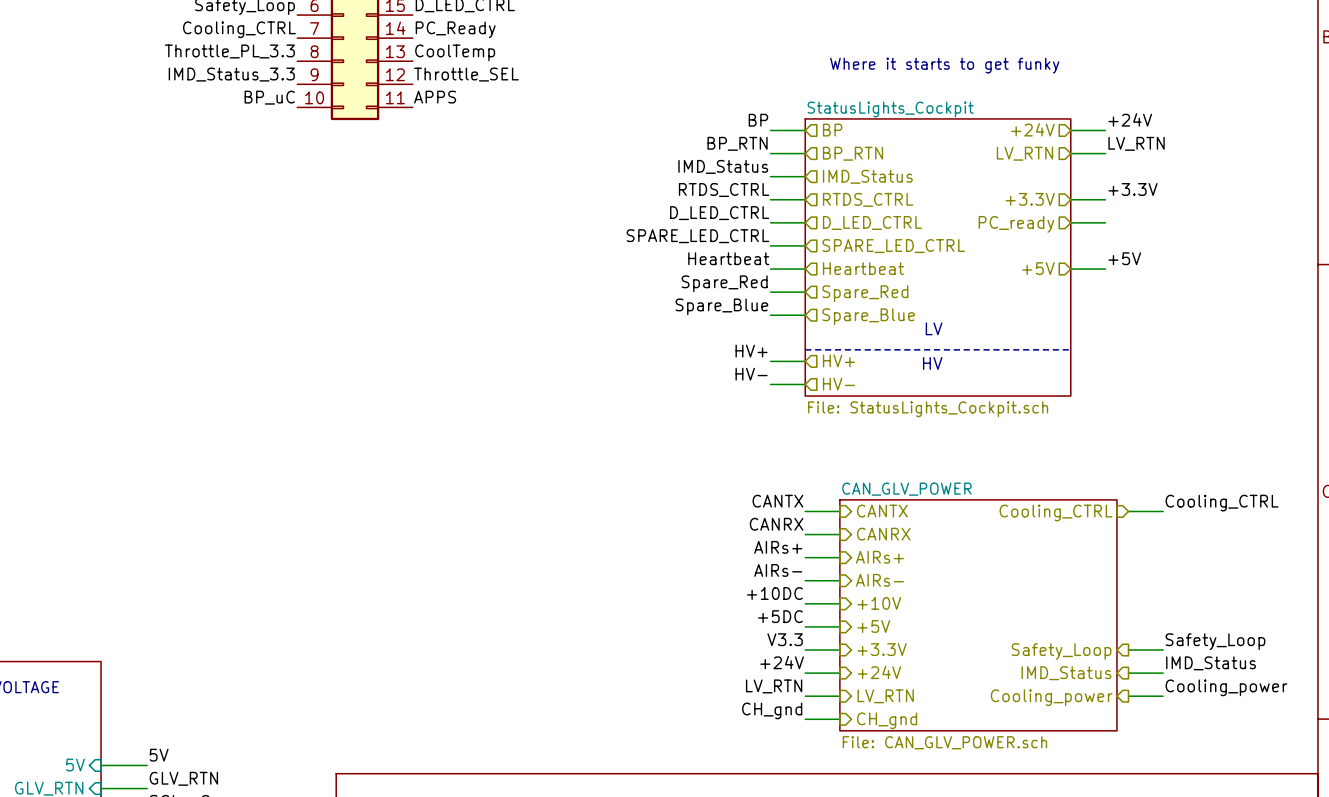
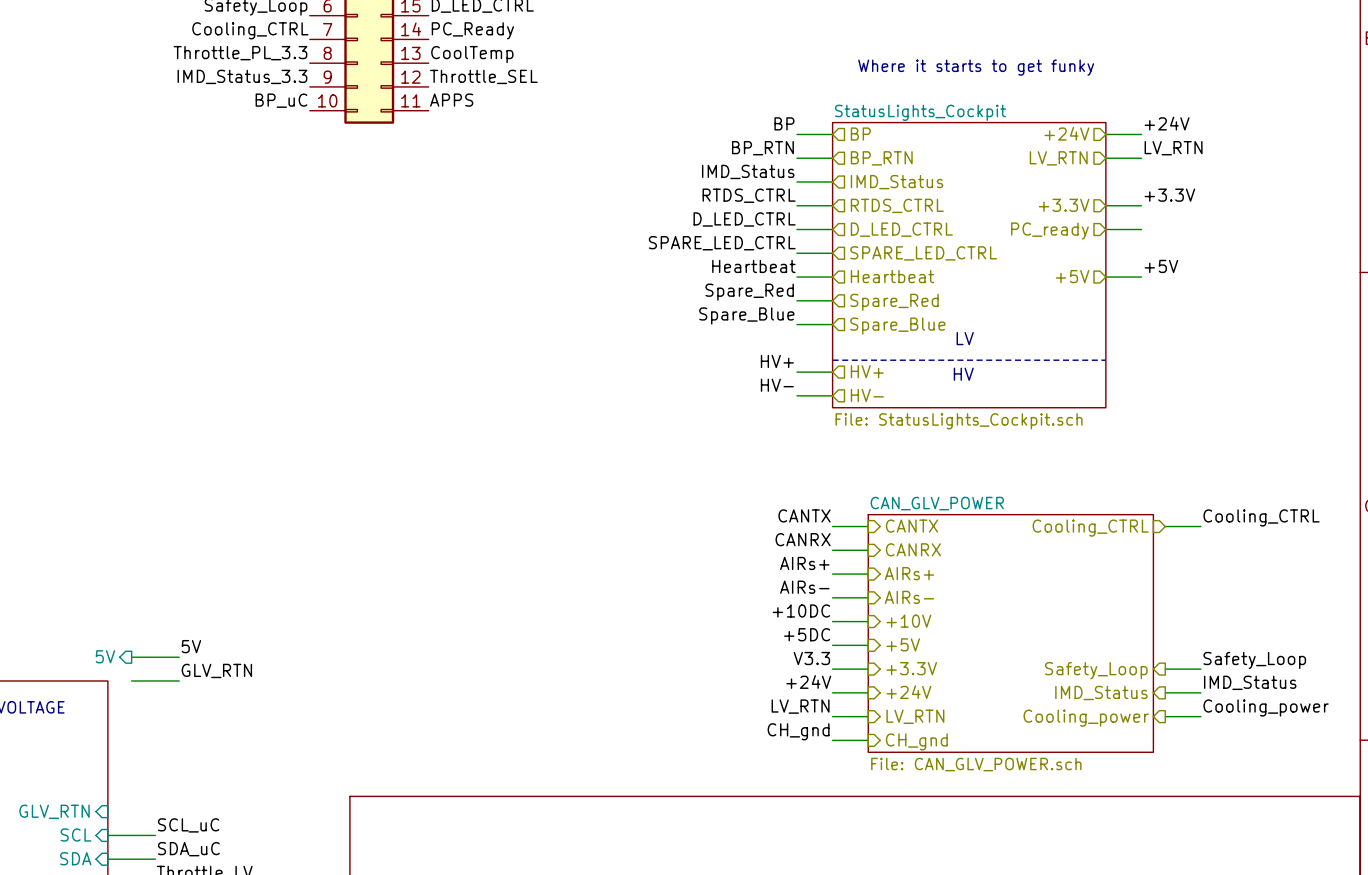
label position: 5V (159, 755) -> 5V (191, 646)
sheet pin position: 5V (75, 765) -> 5V (105, 656)
wire: (101, 765) (147, 765) -> (131, 657) (179, 657)
label position: GLV_RTN (183, 778) -> GLV_RTN (216, 670)
wire: (101, 788) (147, 788) -> (131, 680) (179, 680)

